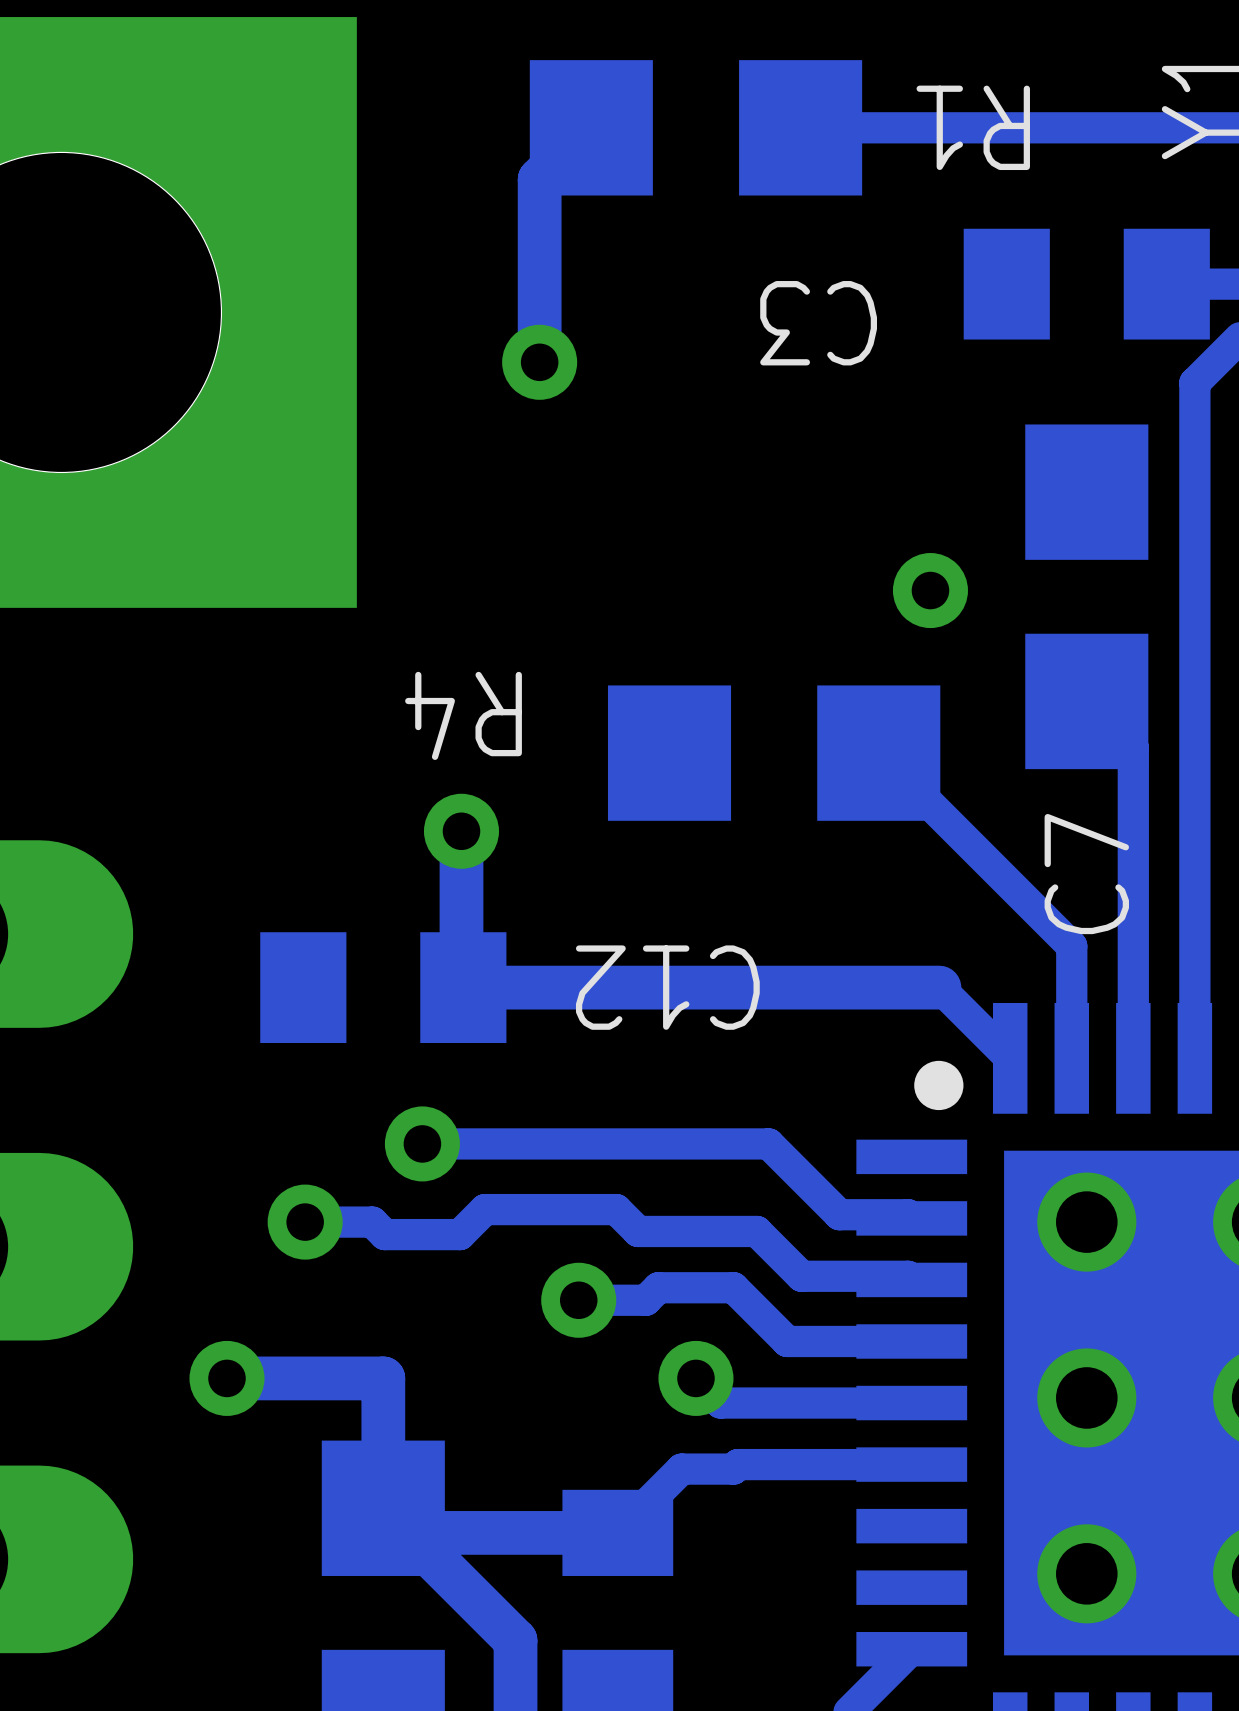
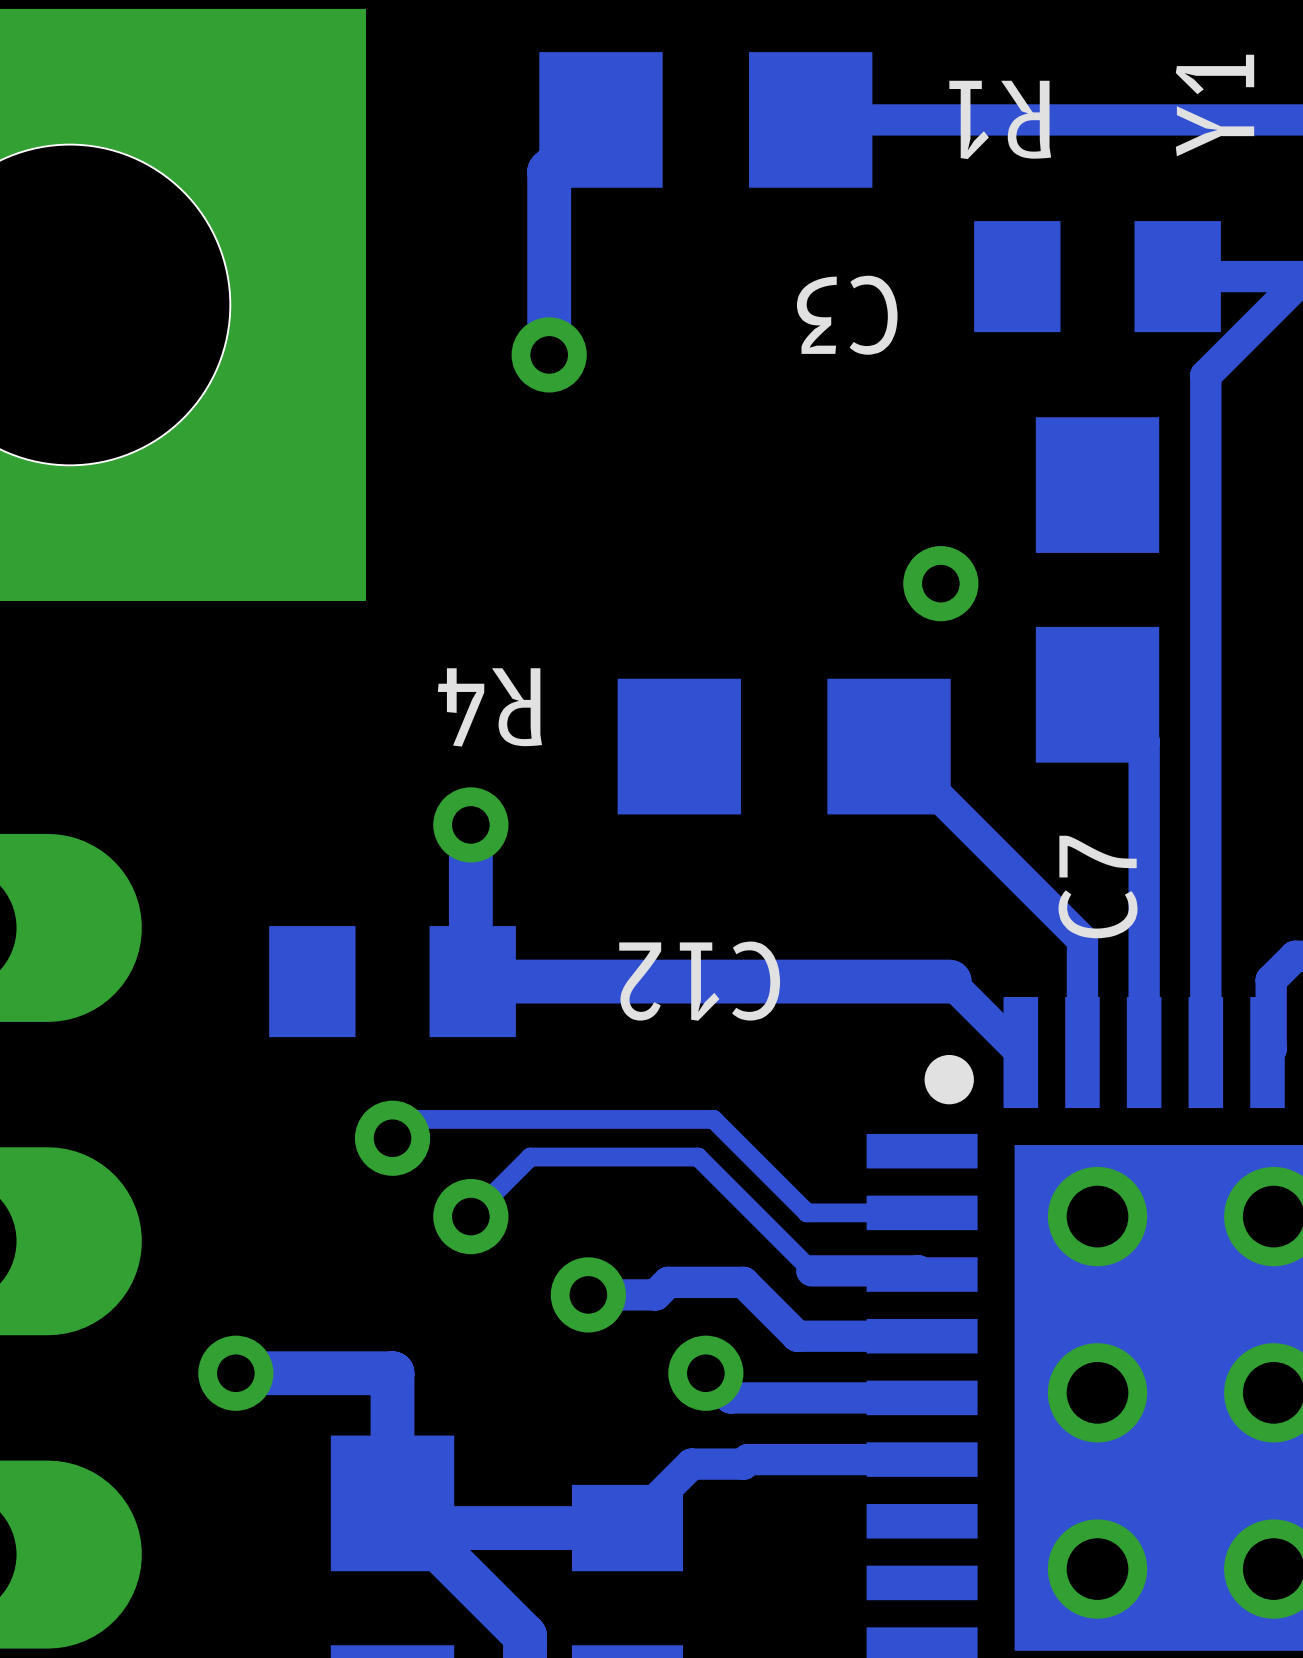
track: (422, 1143) (768, 1143) (839, 1214) (908, 1214) (911, 1218) -> (392, 1138) (411, 1119) (713, 1119) (807, 1212) (922, 1212)
via position: (422, 1143) -> (392, 1138)
track: (305, 1222) (372, 1222) (384, 1234) (459, 1234) (484, 1209) (616, 1209) (638, 1231) (756, 1231) -> (470, 1216) (530, 1157) (698, 1157) (766, 1225)
via: (305, 1222) -> none
via: none -> (470, 1216)
track width: thick (756, 1231) (801, 1276) -> thin (766, 1225) (811, 1270)

